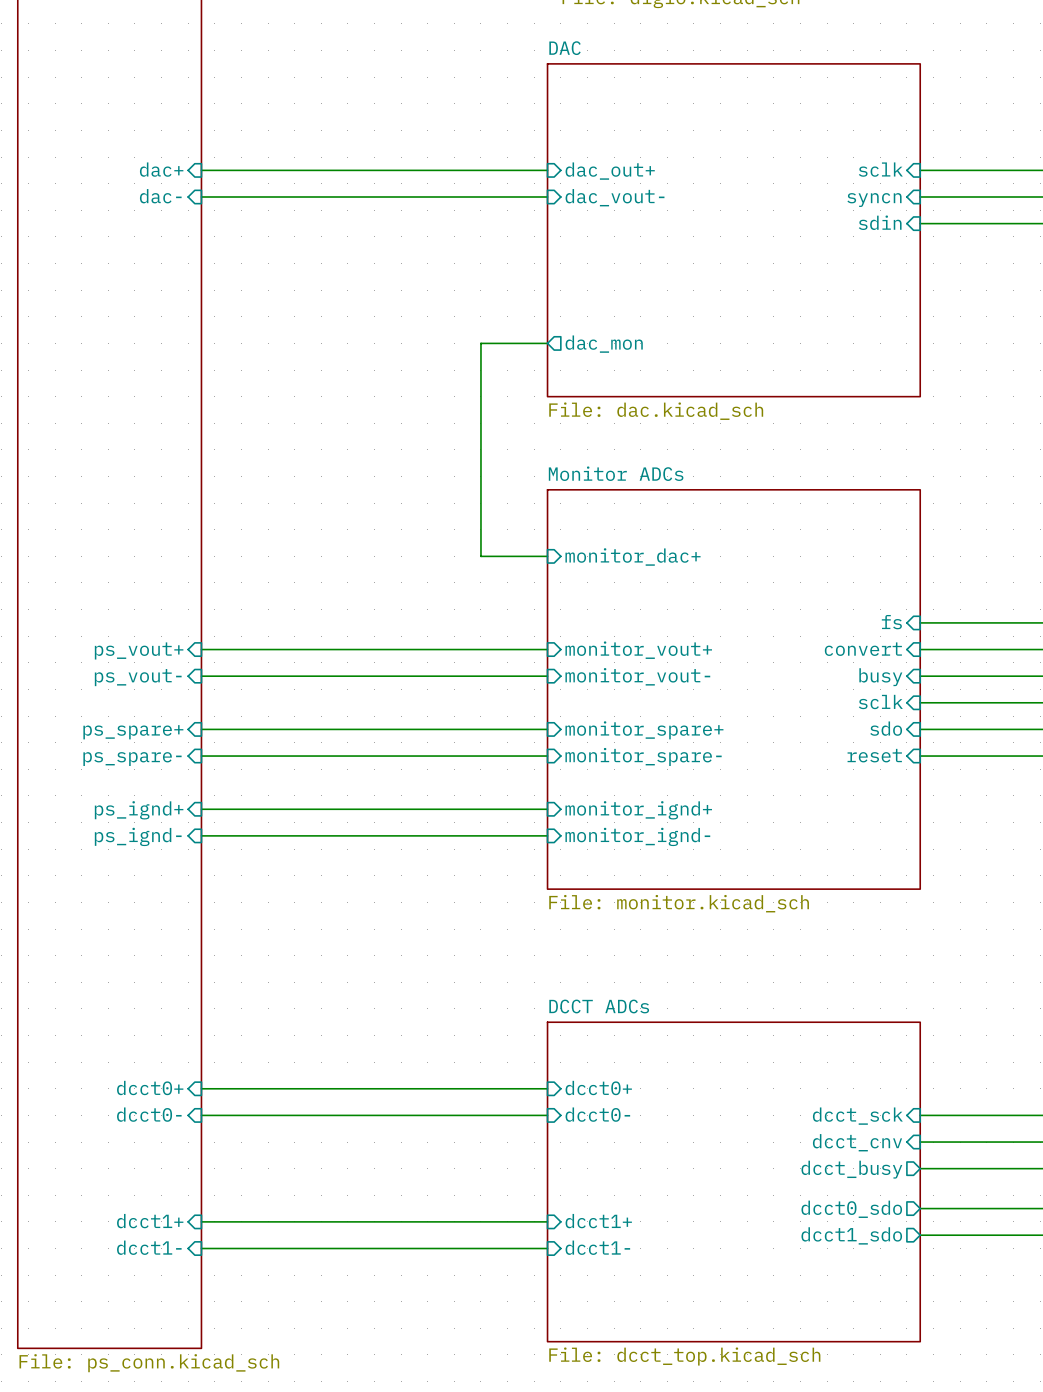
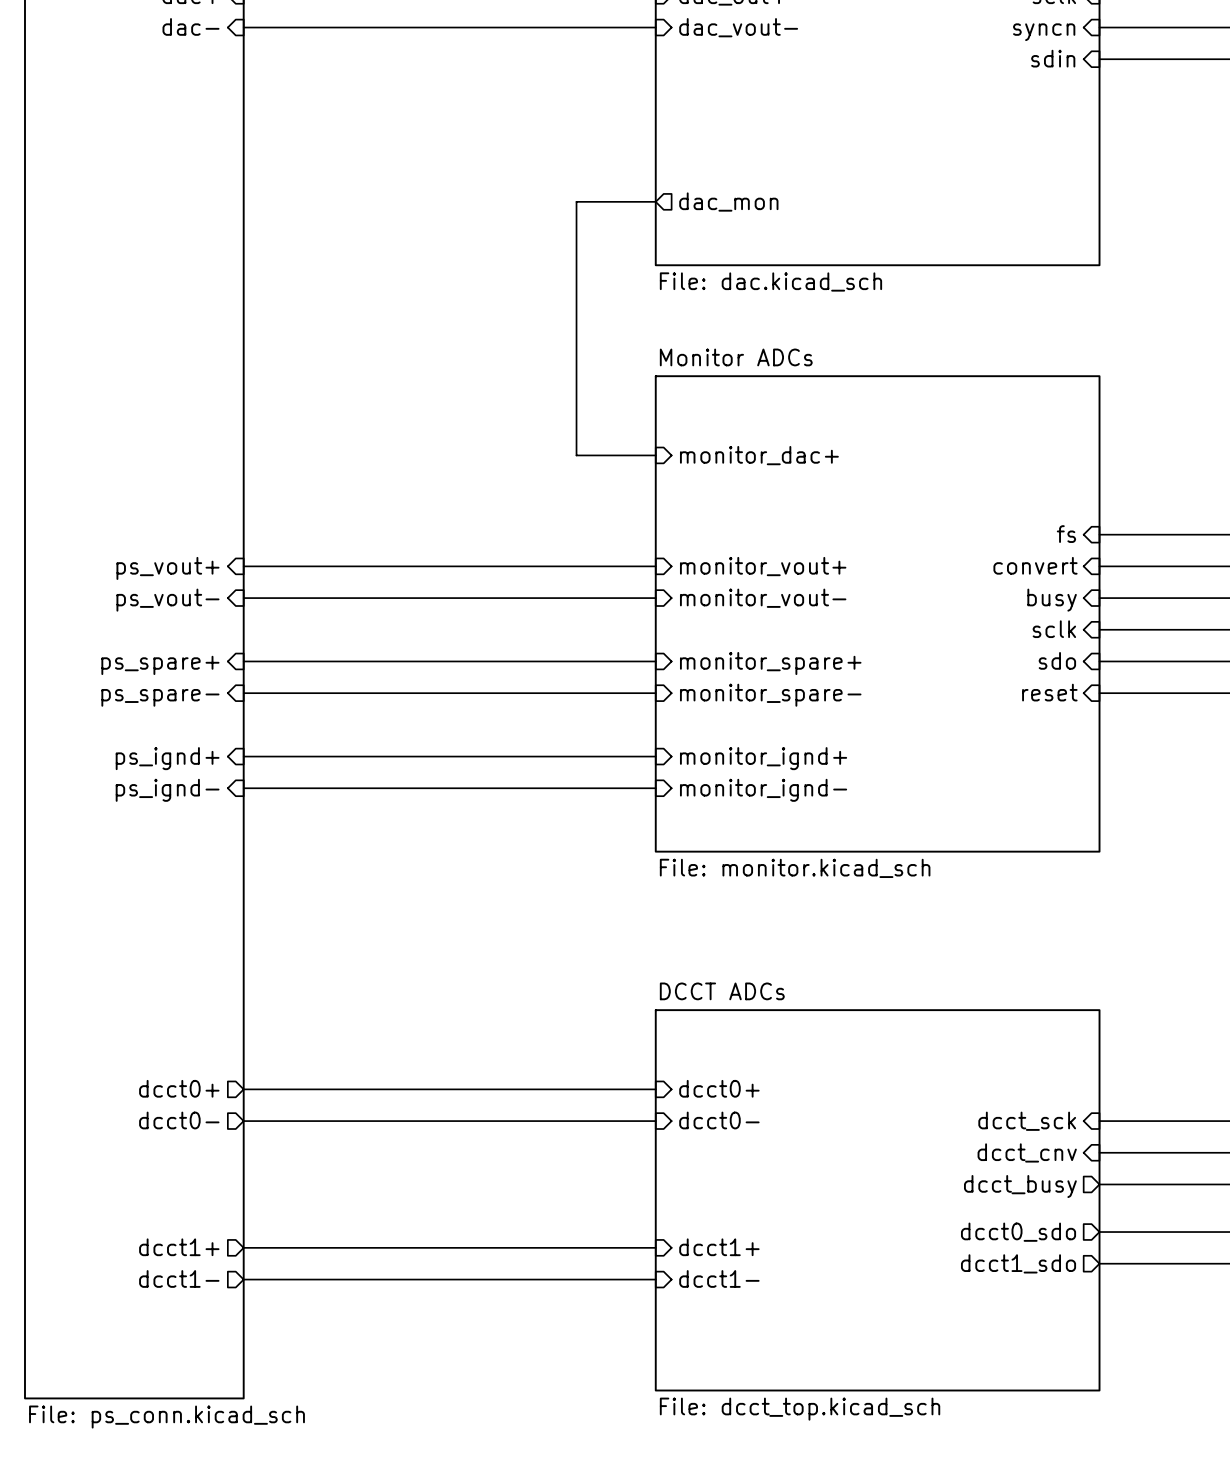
sheet pin shape: input (150, 1088) -> output (179, 1088)
sheet pin shape: input (149, 1114) -> output (179, 1120)
sheet pin shape: input (150, 1221) -> output (179, 1247)
sheet pin shape: input (149, 1247) -> output (179, 1278)

